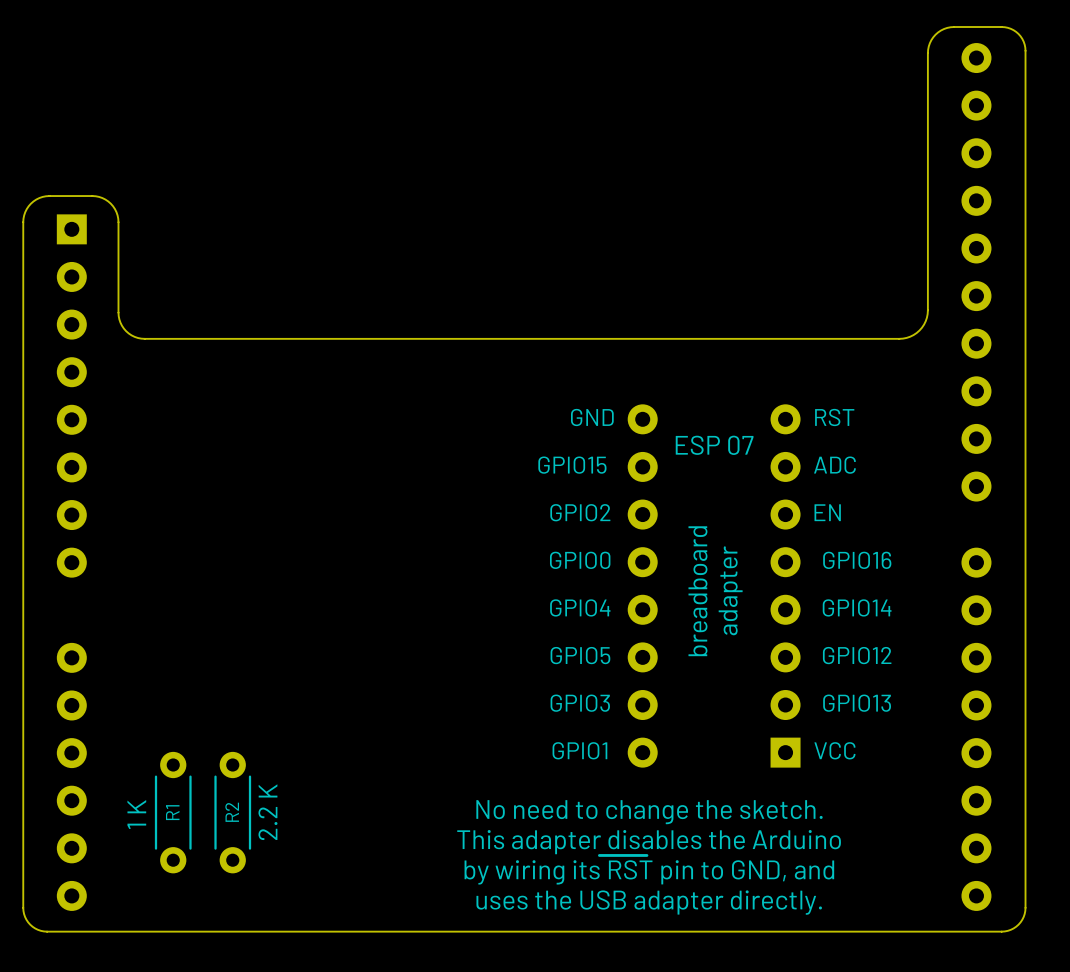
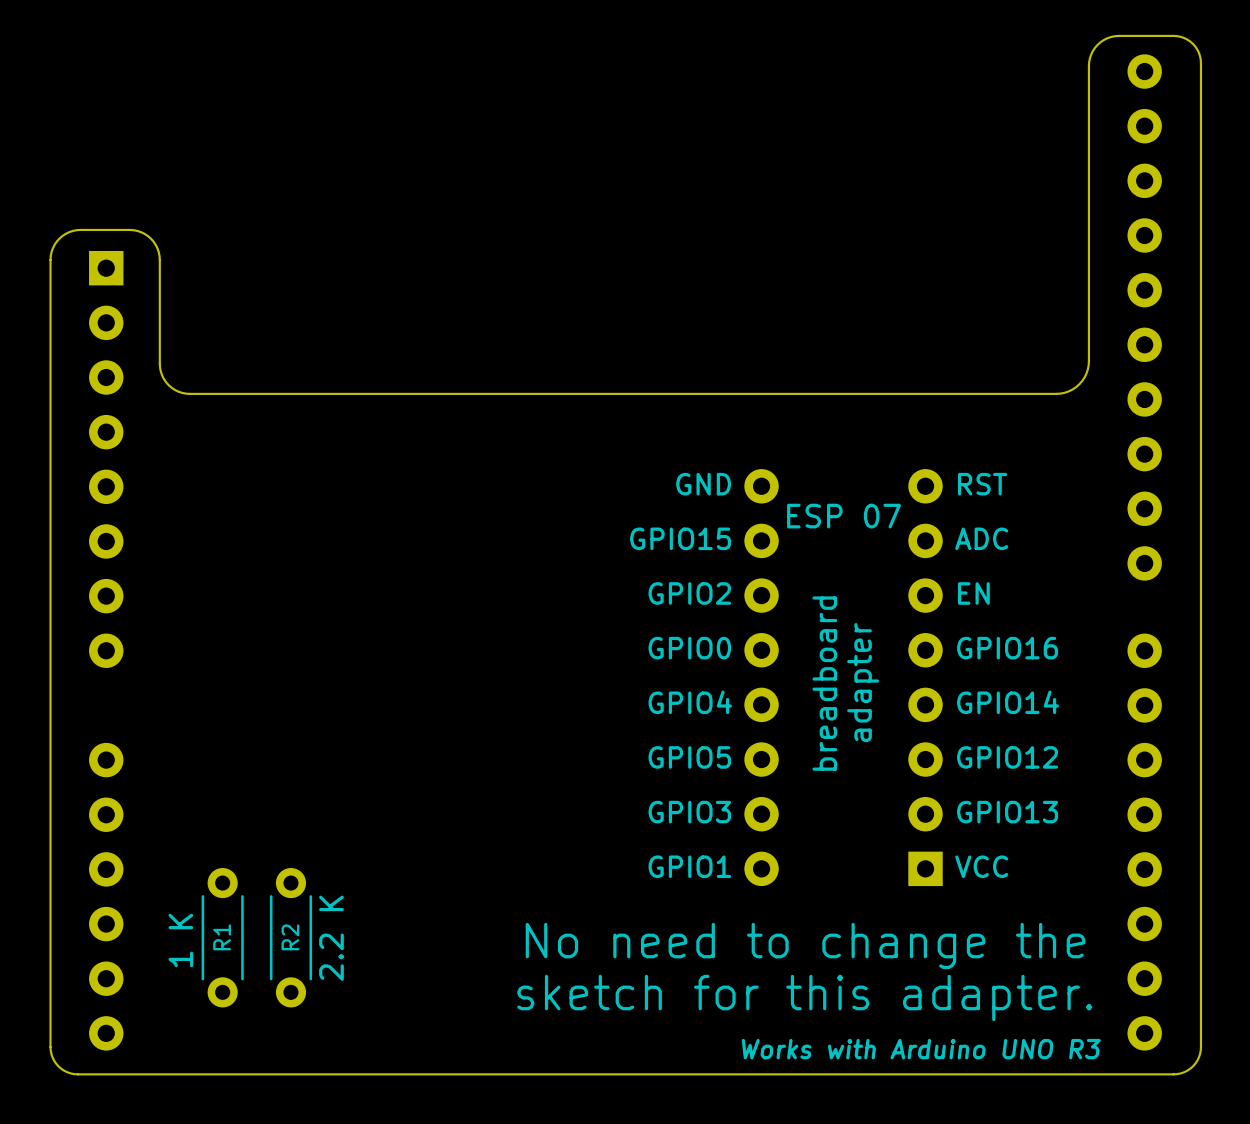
text: No need to change the sketch. (649, 812) -> No need to change the (805, 945)
text: This adapter disables the Arduino (649, 842) -> none
line: (599, 855) (646, 855) -> none
text: none -> sketch for this adapter. (804, 997)
text: by wiring its RST pin to GND, and (649, 872) -> none
text: uses the USB adapter directly. (649, 902) -> none
text: none -> Works with Arduino UNO R3 (921, 1049)

